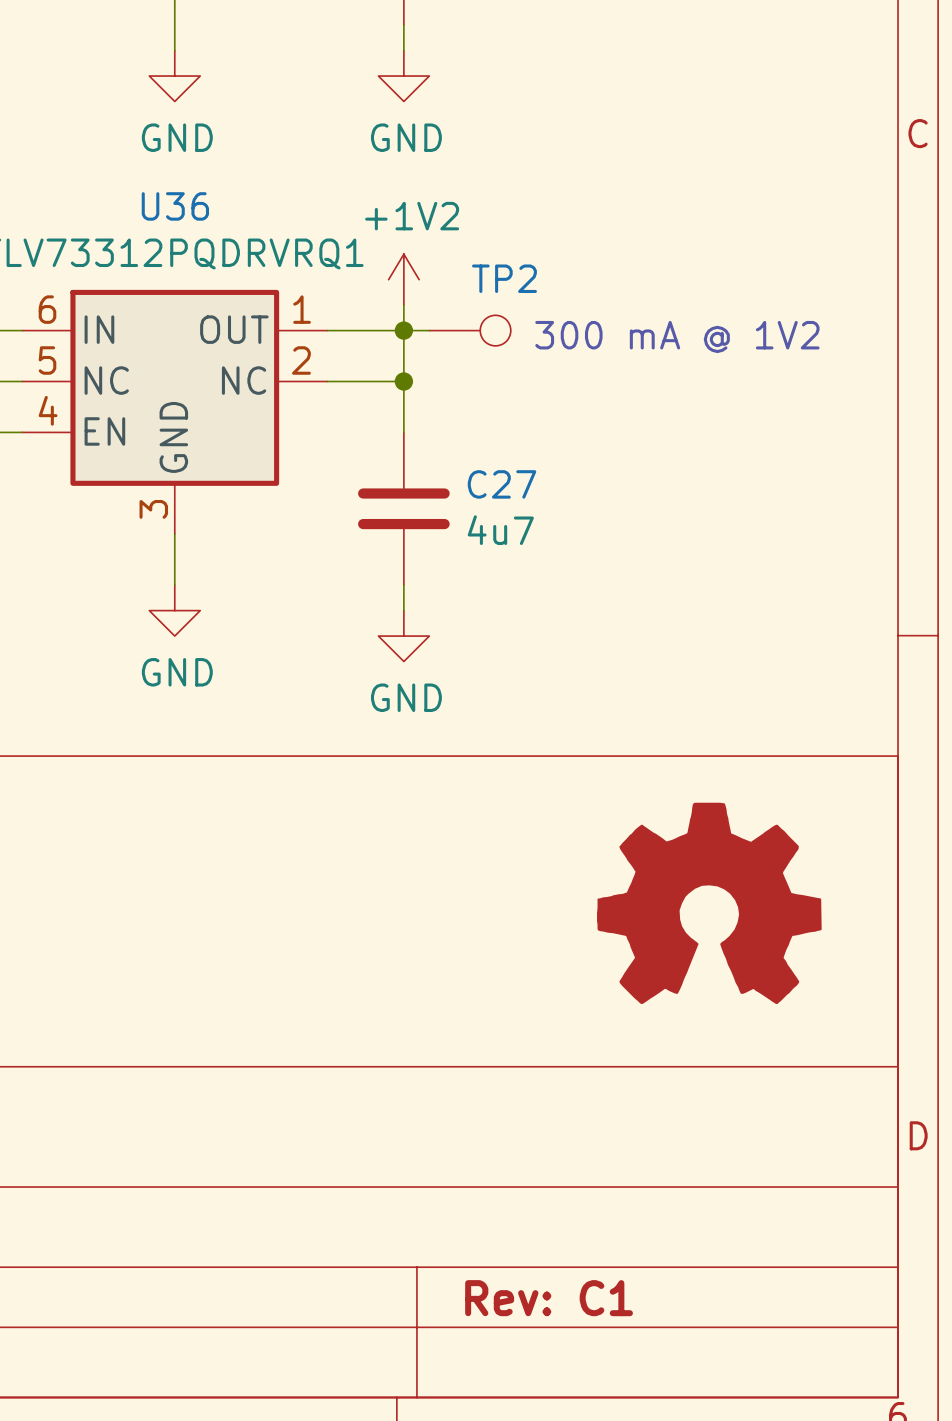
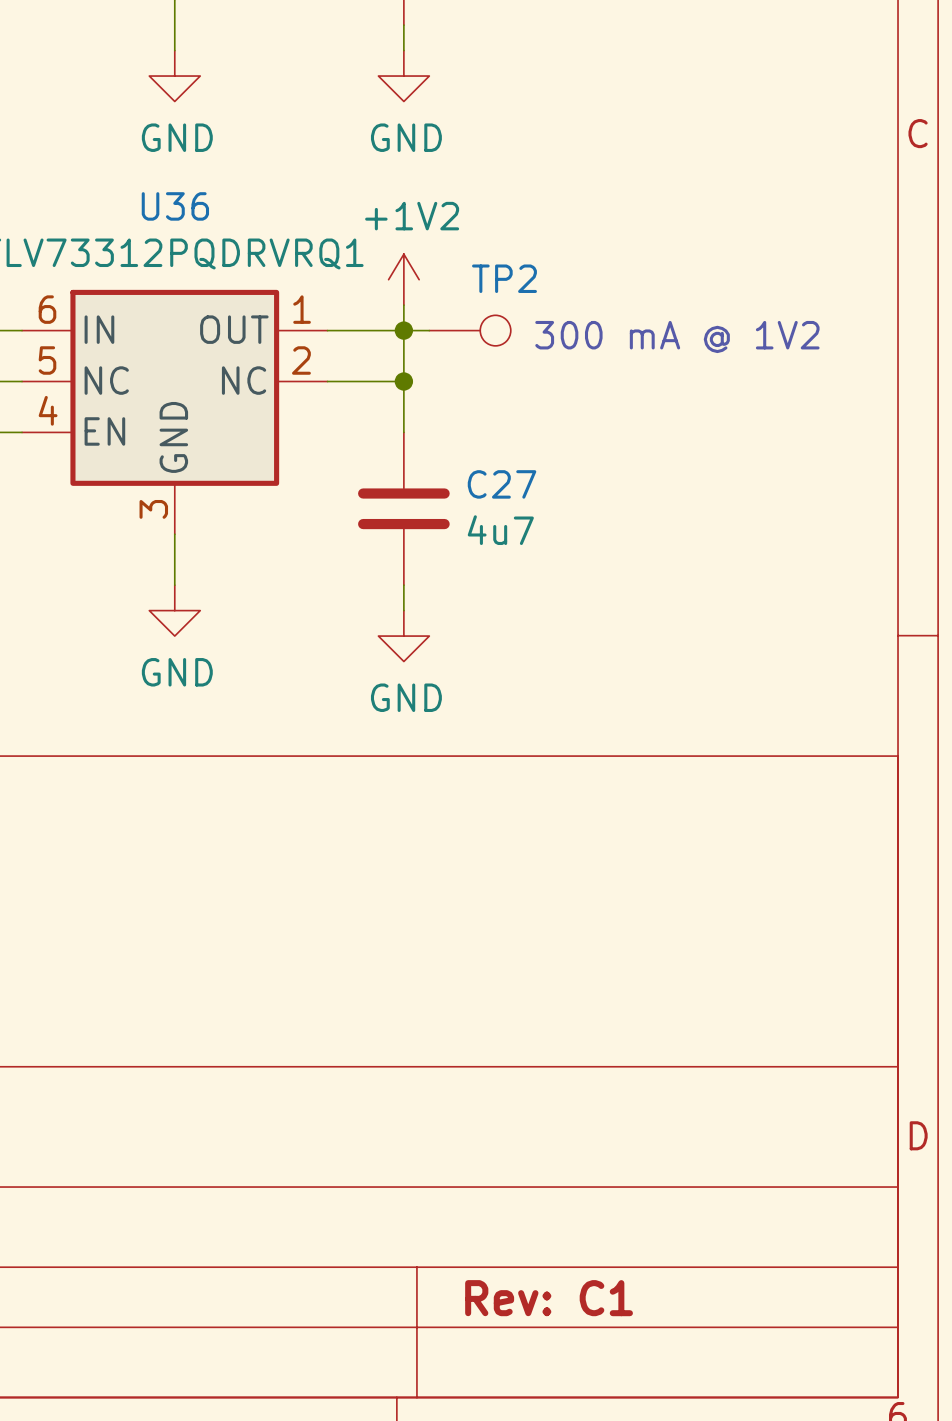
power symbol: (709, 903) -> none

